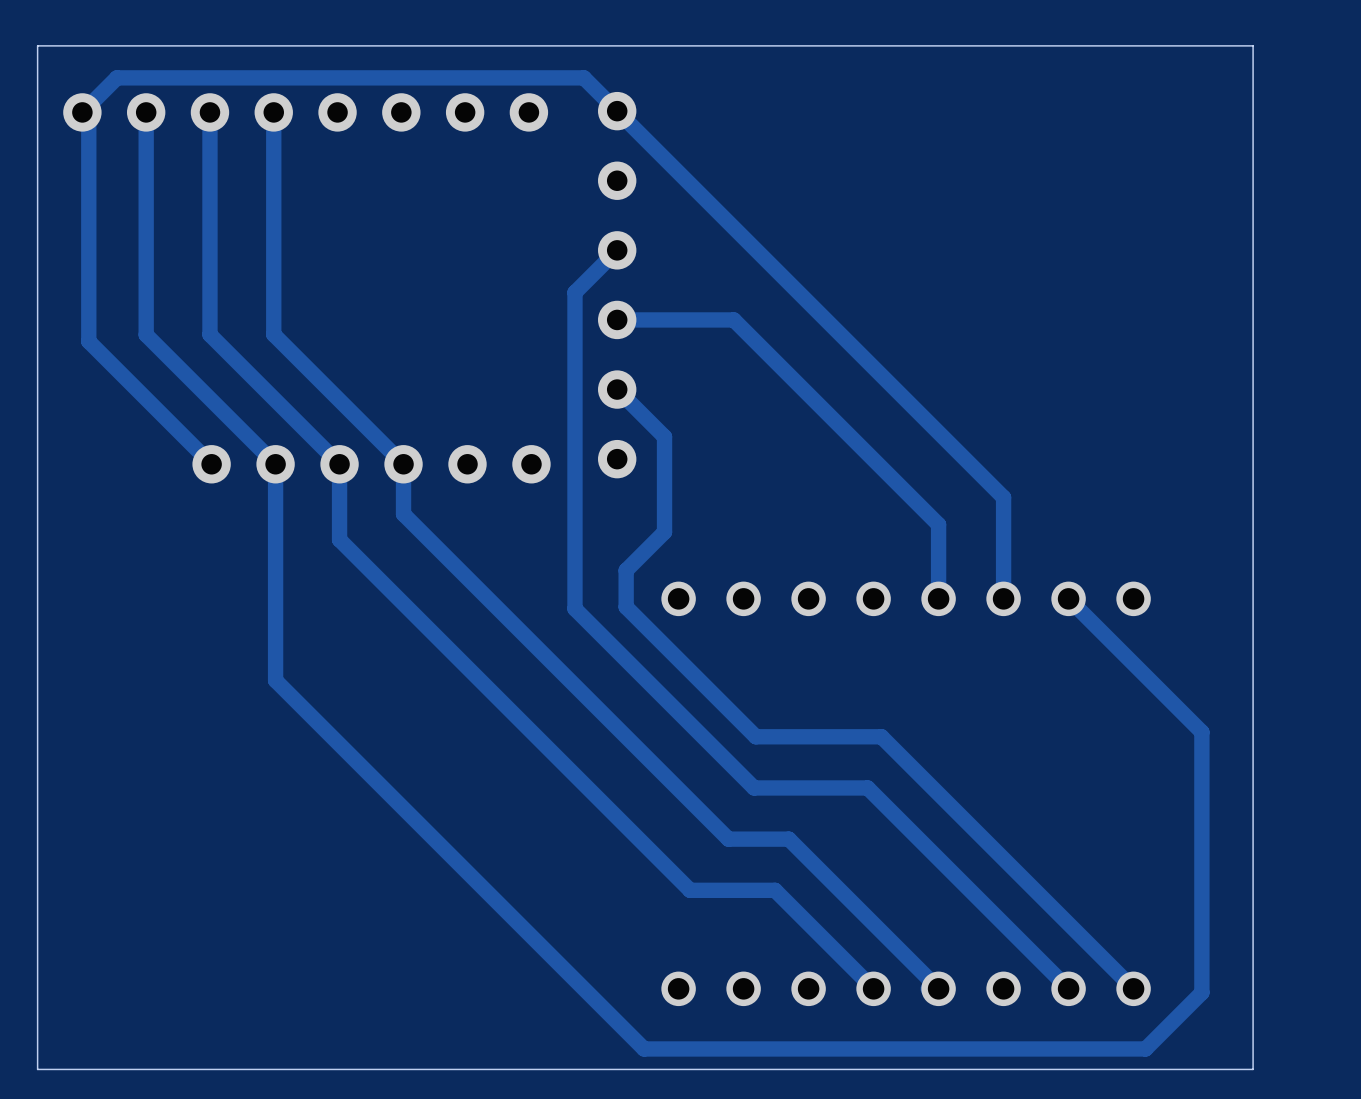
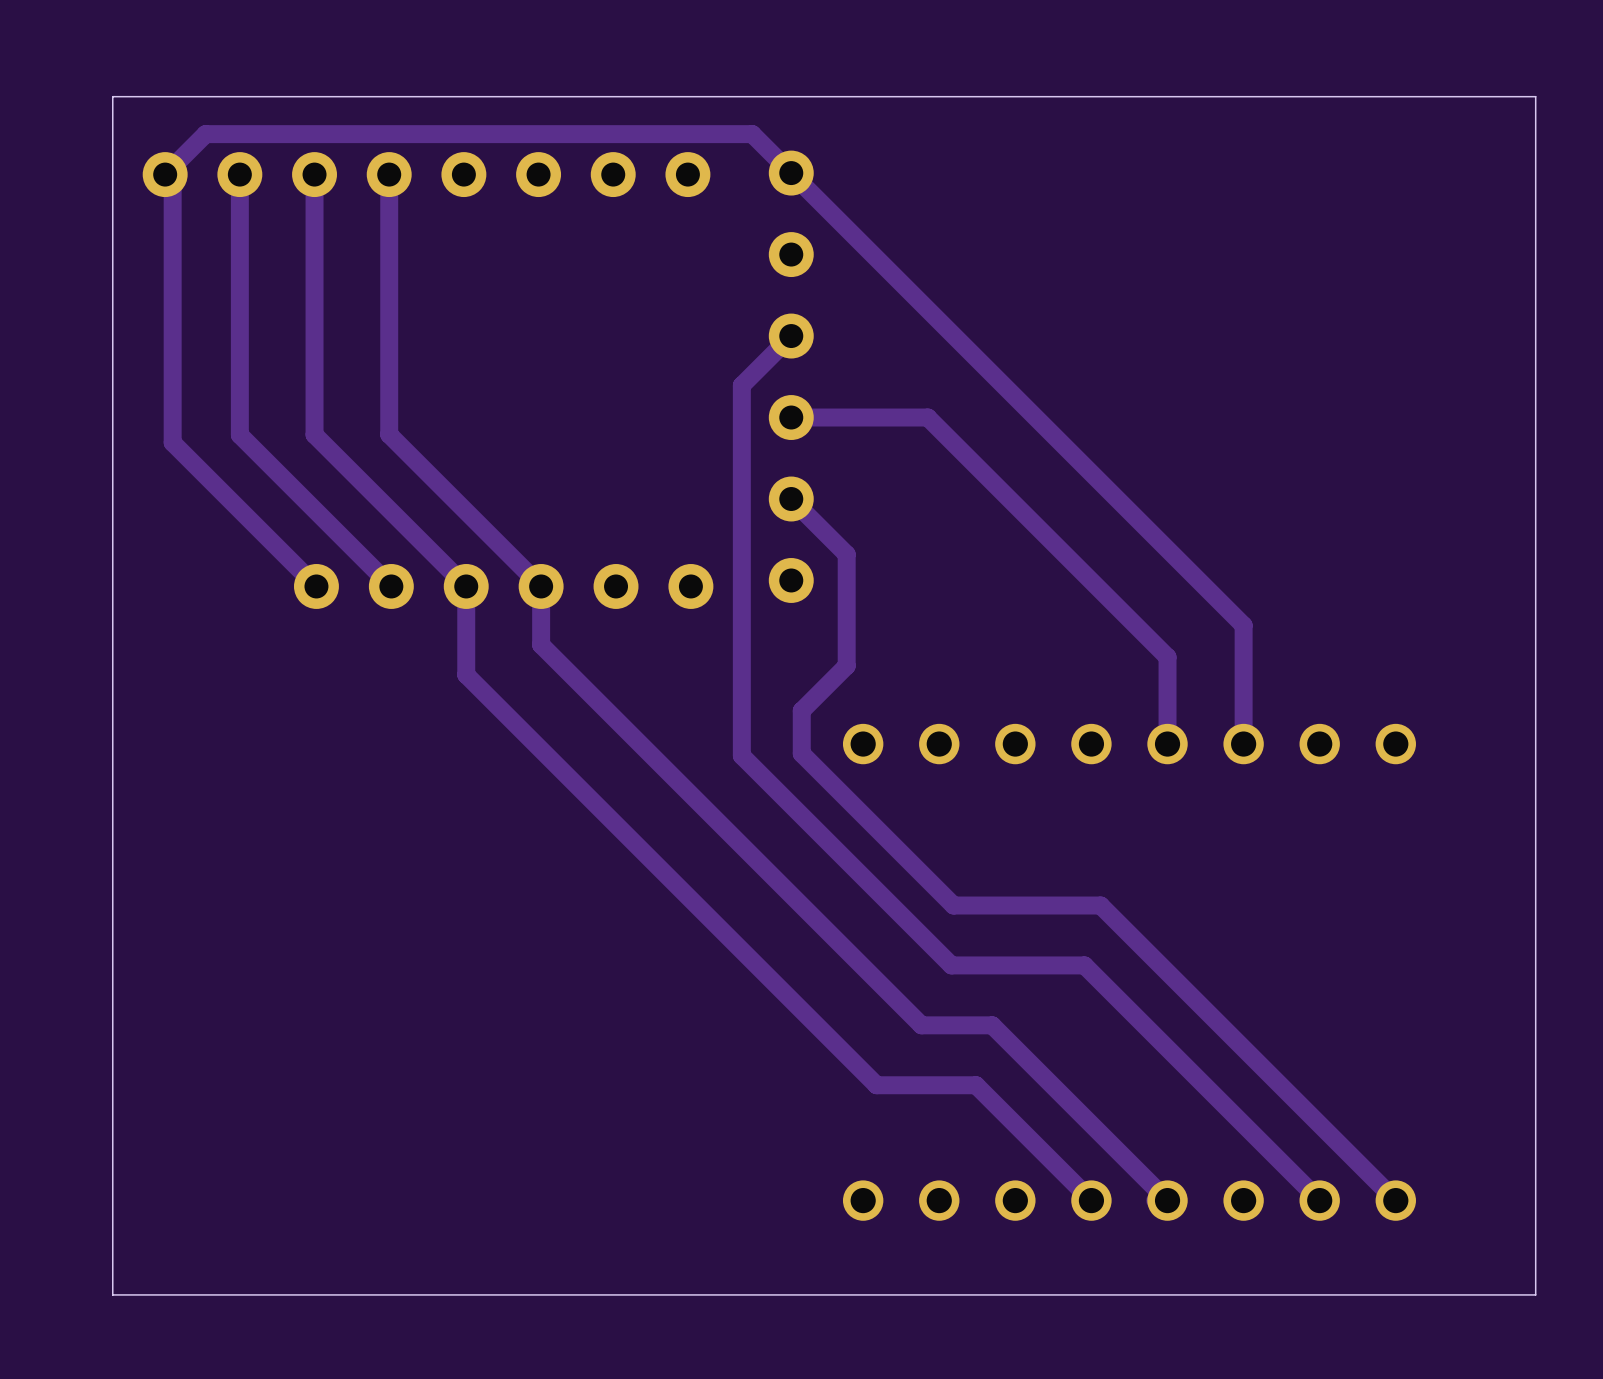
track: (275, 464) (275, 680) (644, 1048) (1145, 1048) (1201, 992) (1201, 732) (1068, 598) -> none

